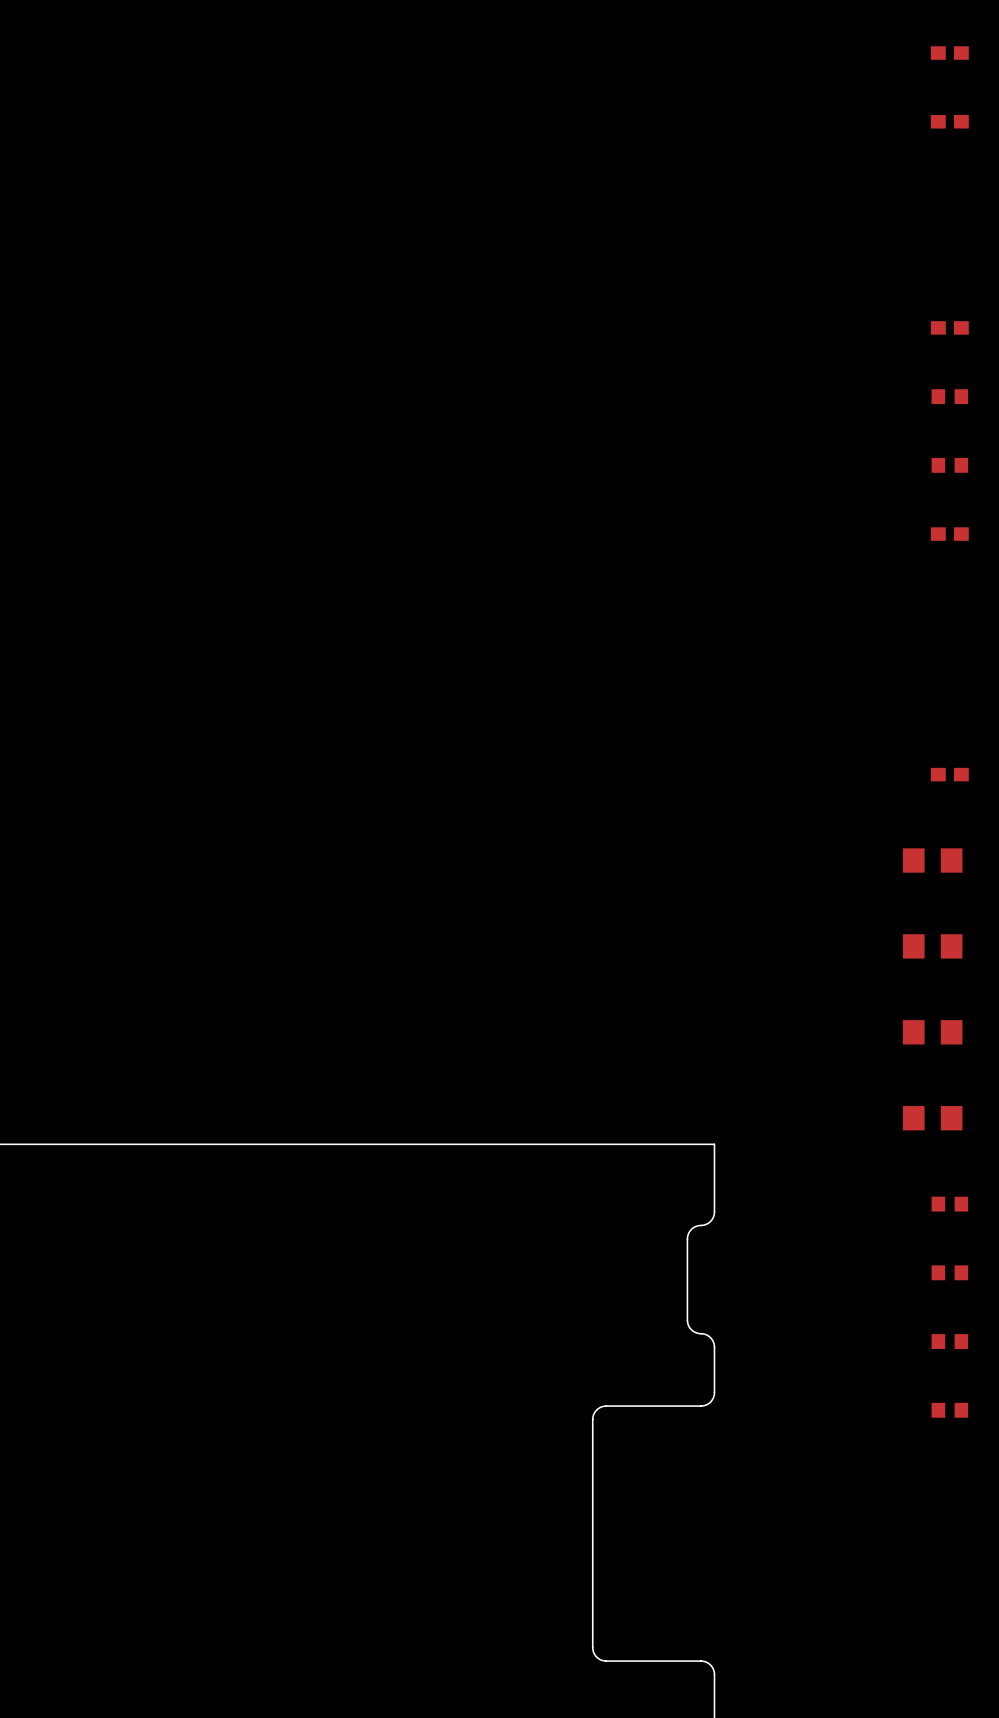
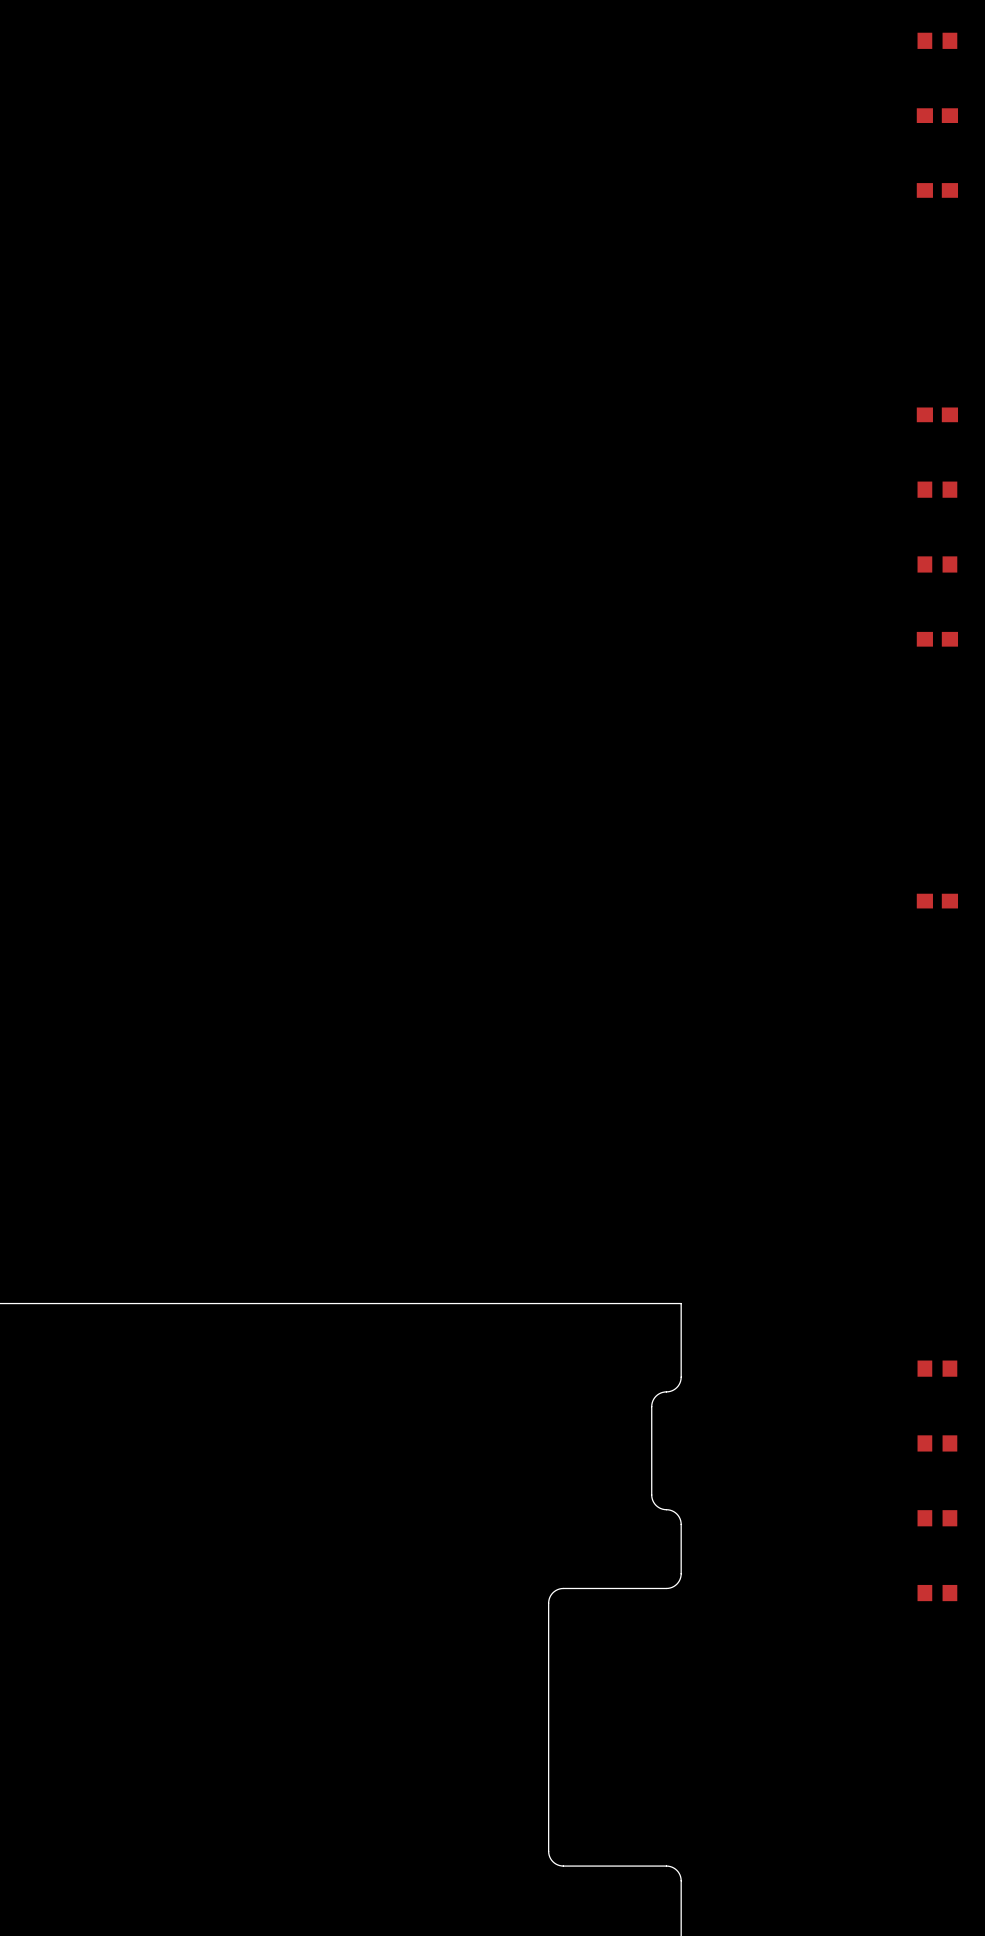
part: (932, 860) -> none
part: (932, 946) -> none
part: (932, 1032) -> none
part: (932, 1118) -> none

